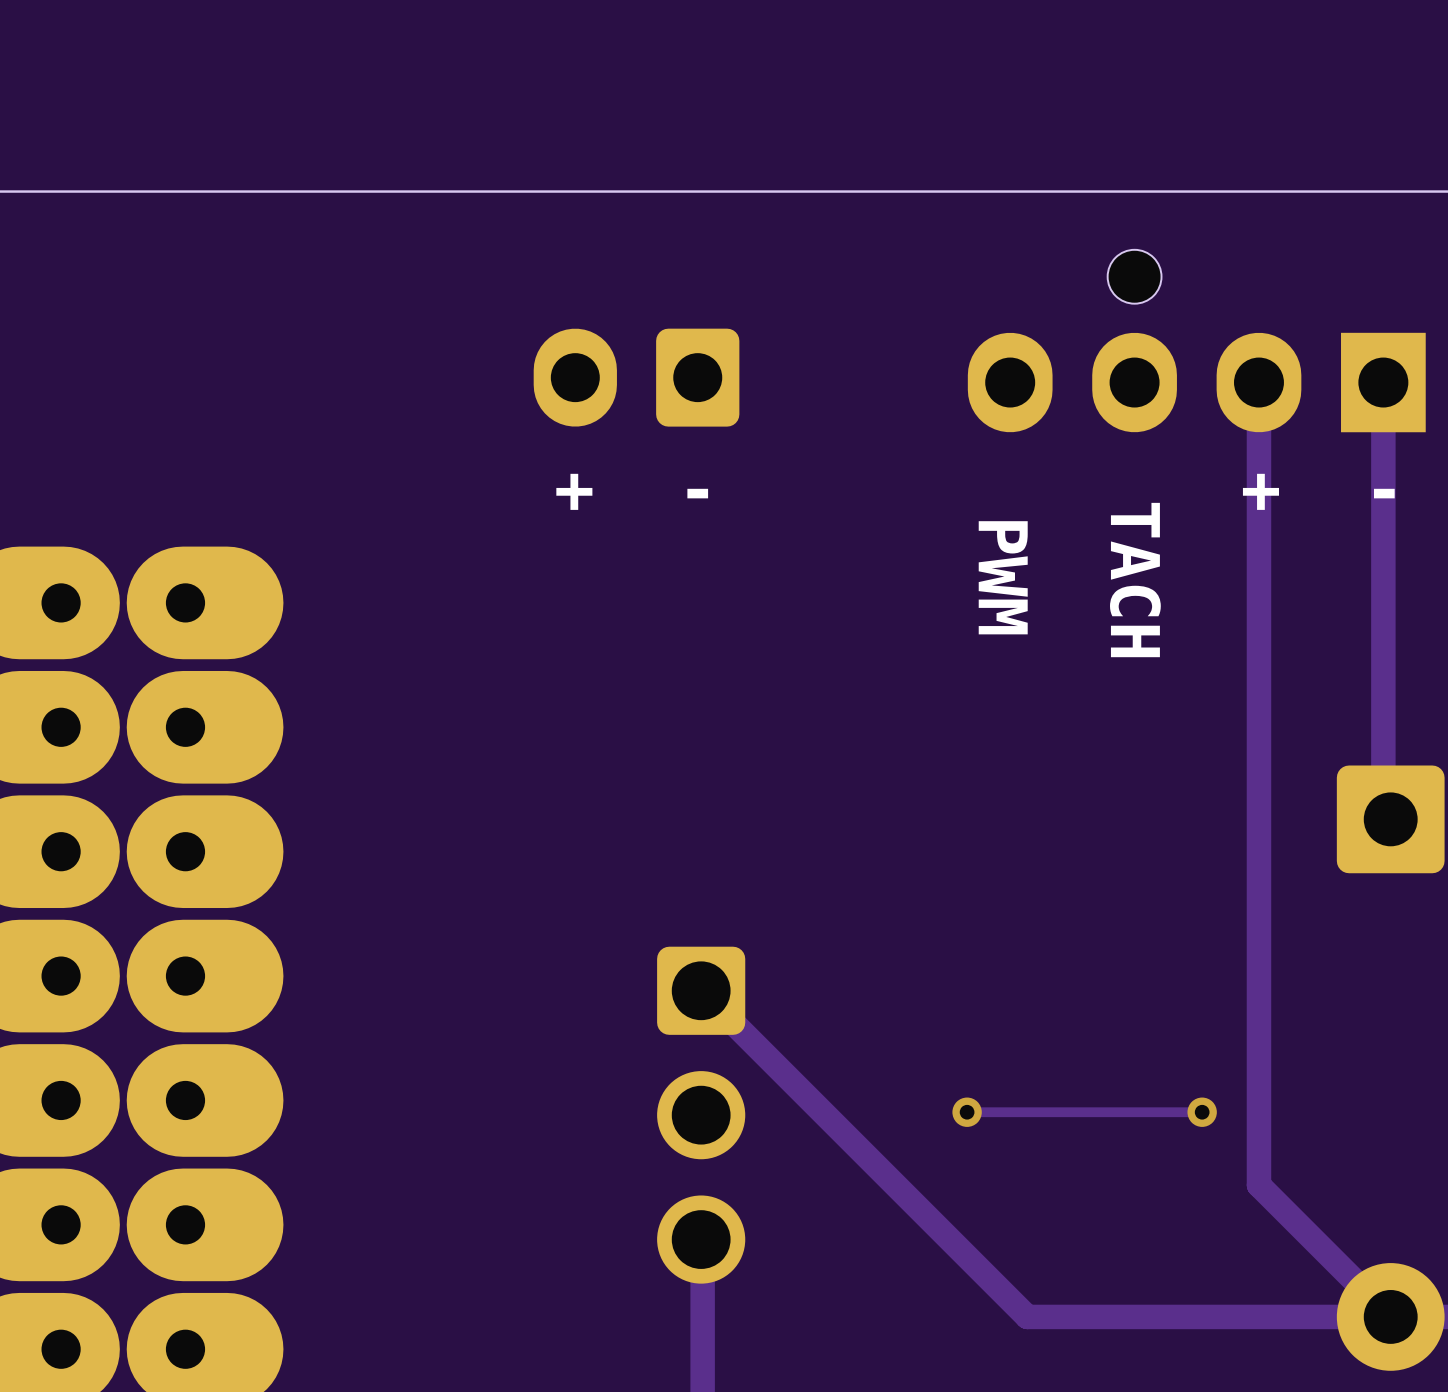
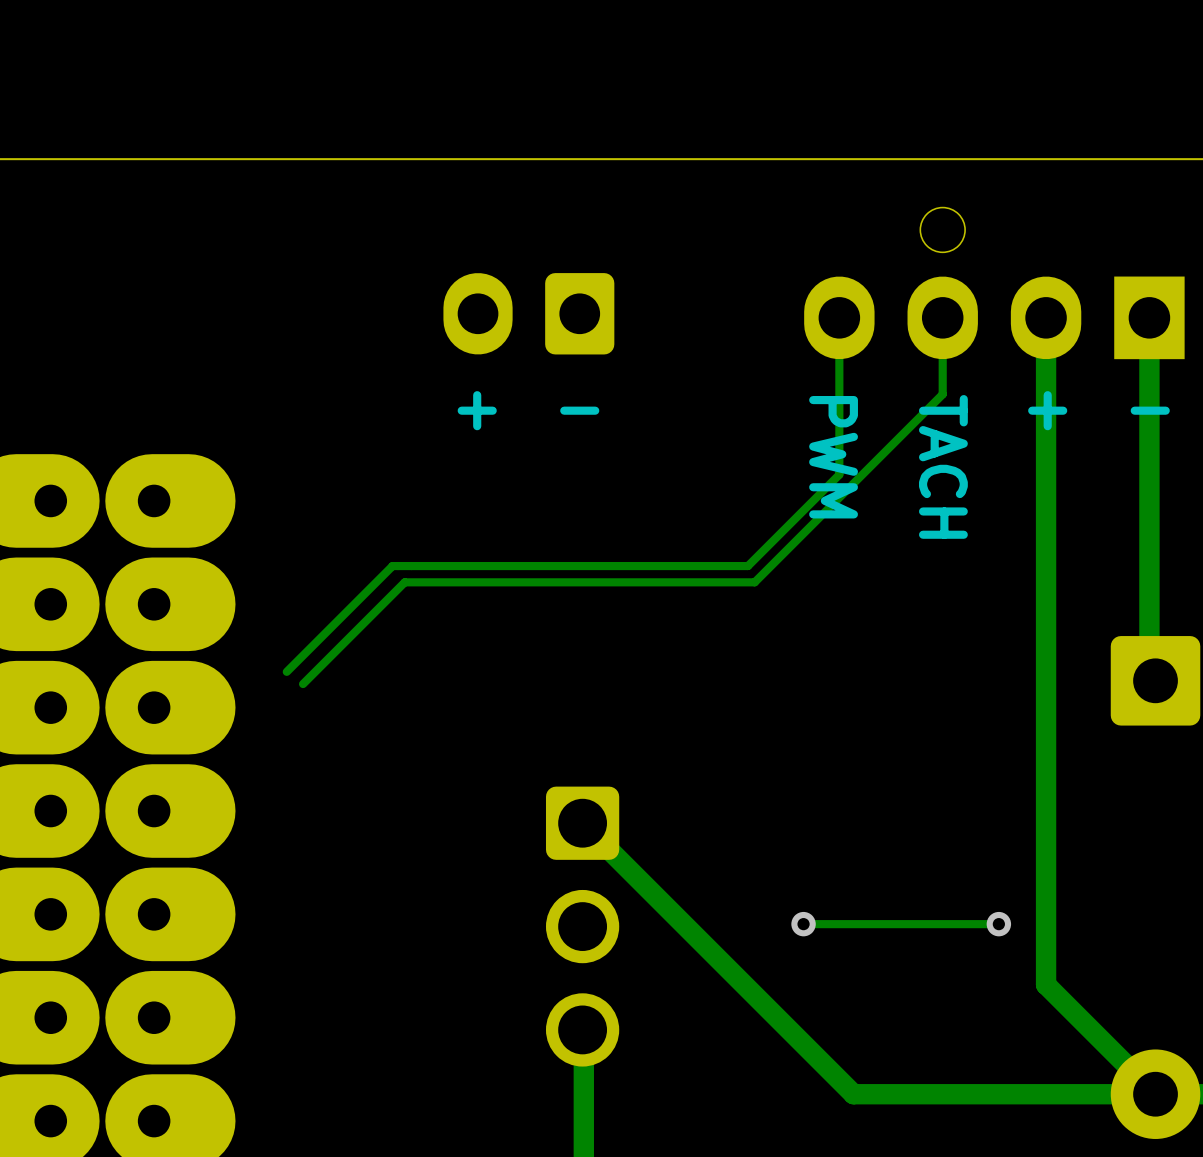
track: none -> (839, 312) (839, 474) (747, 566) (392, 566) (286, 671)
track: none -> (942, 317) (942, 394) (754, 582) (404, 582) (303, 684)

